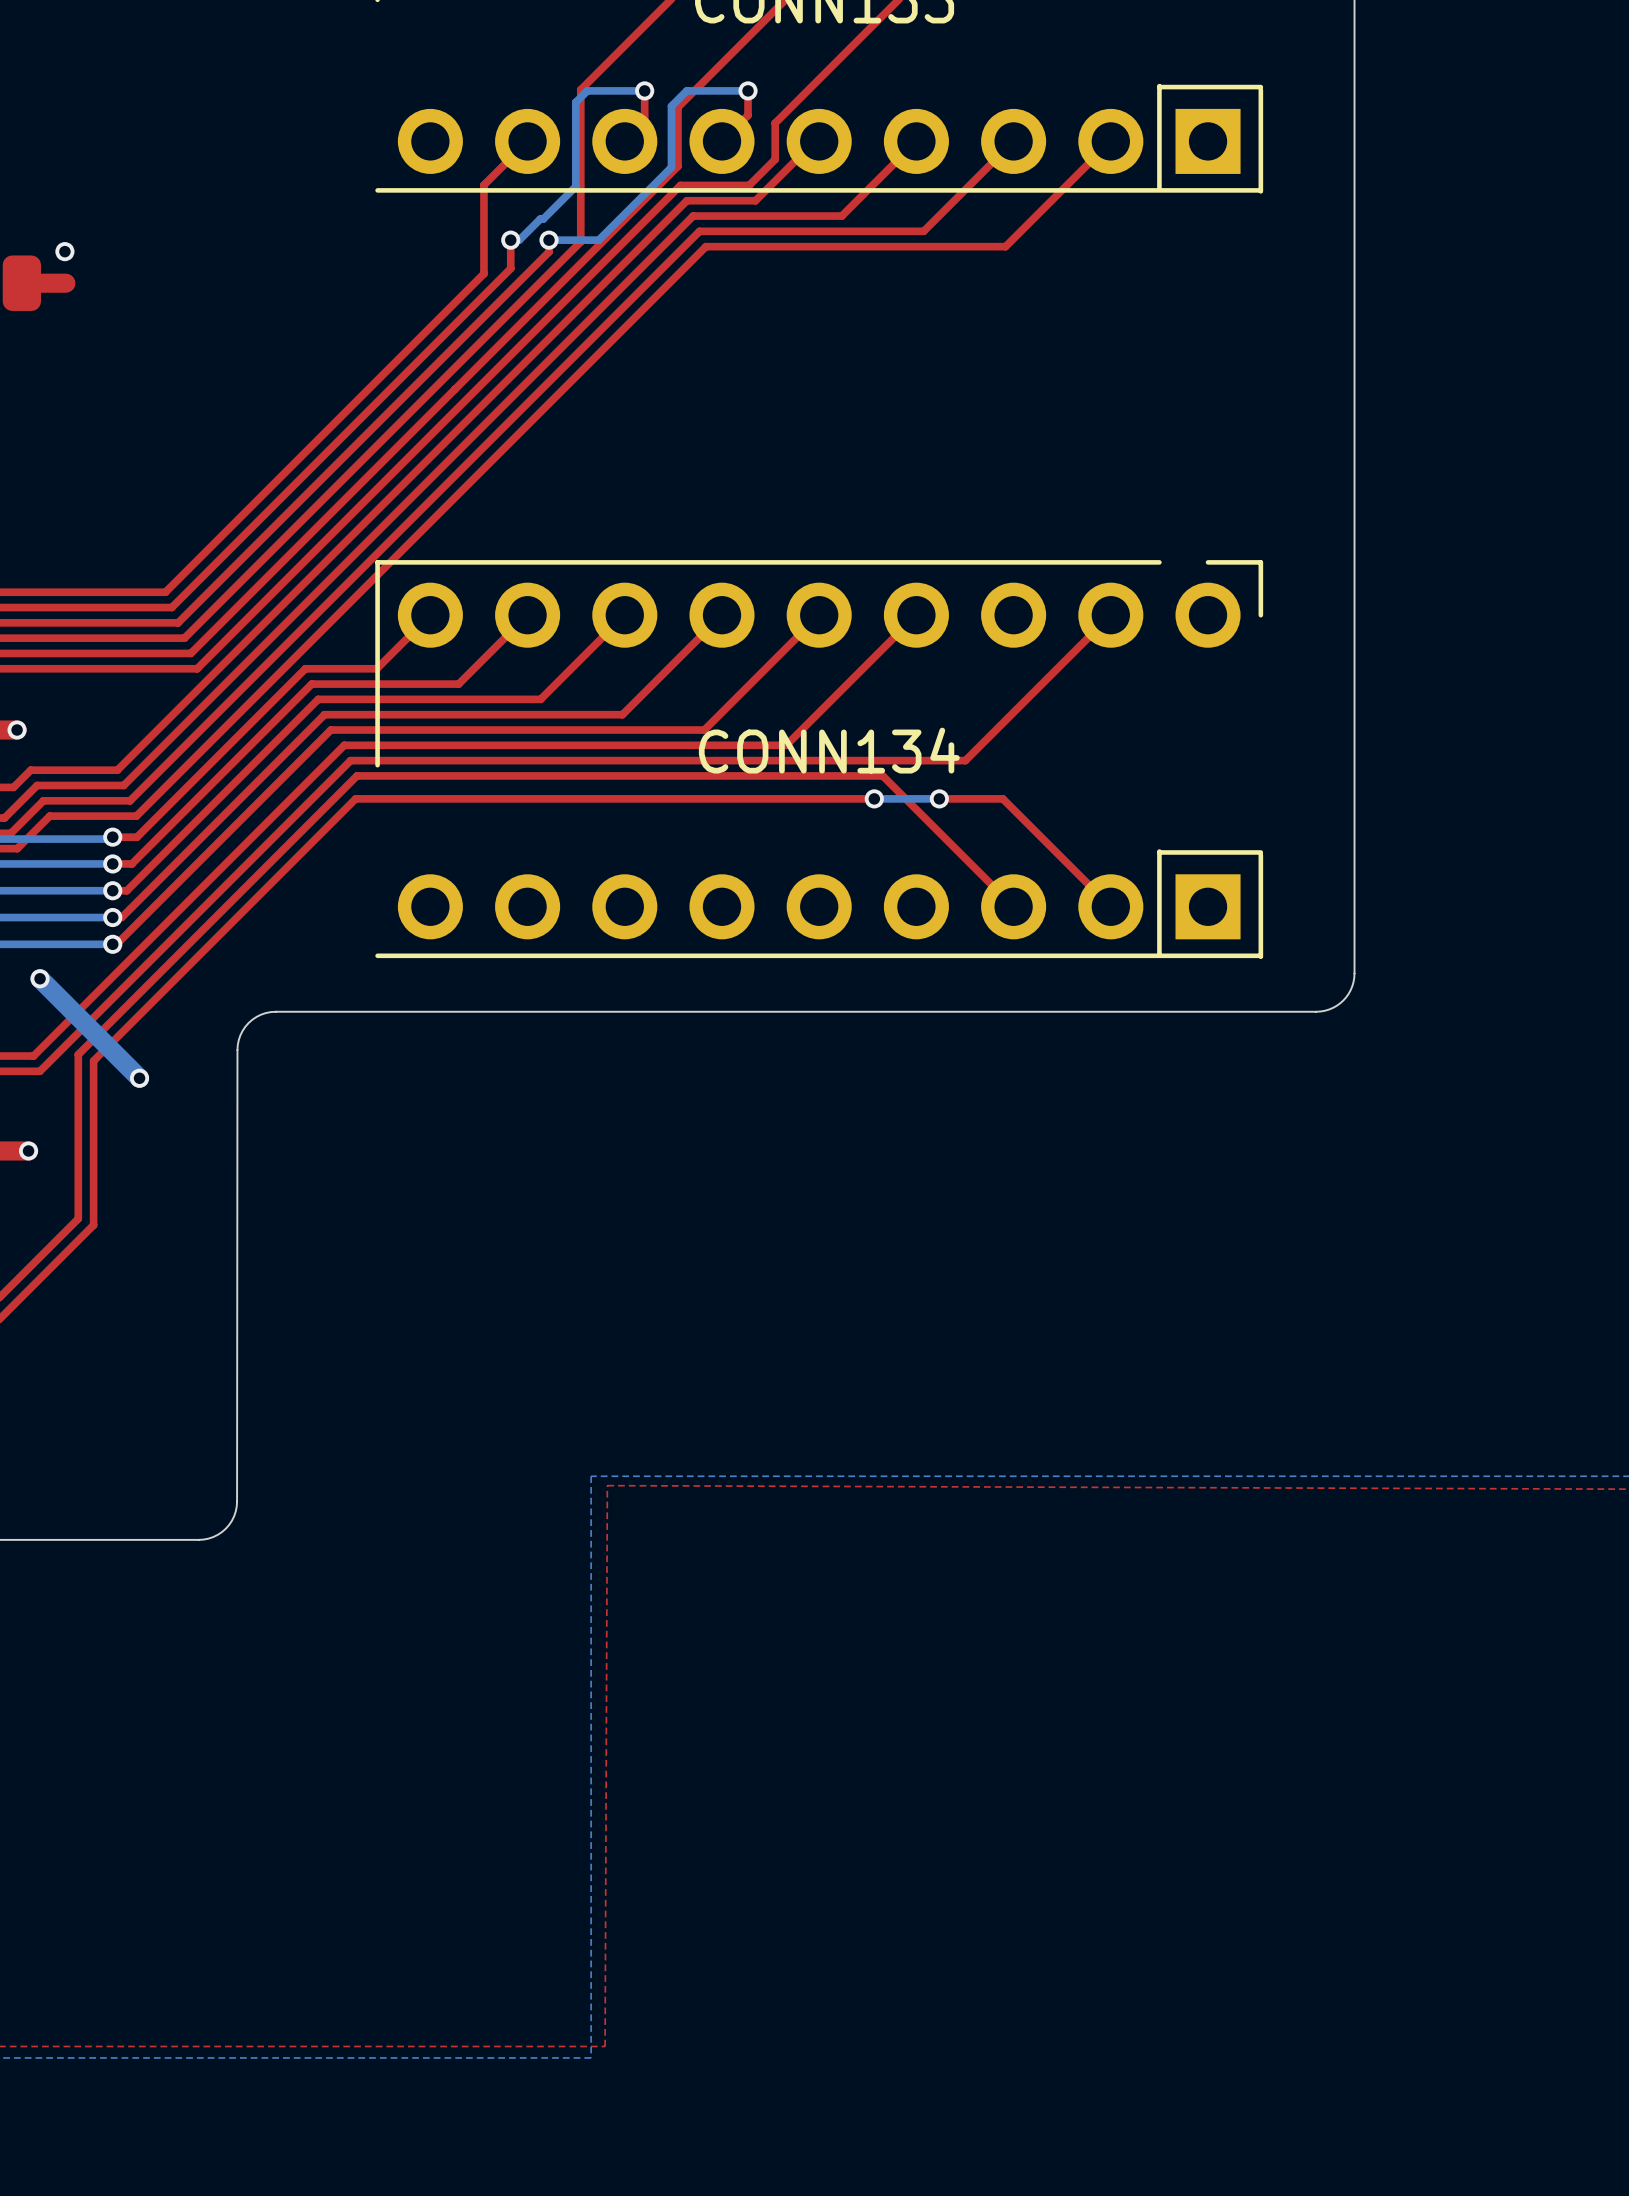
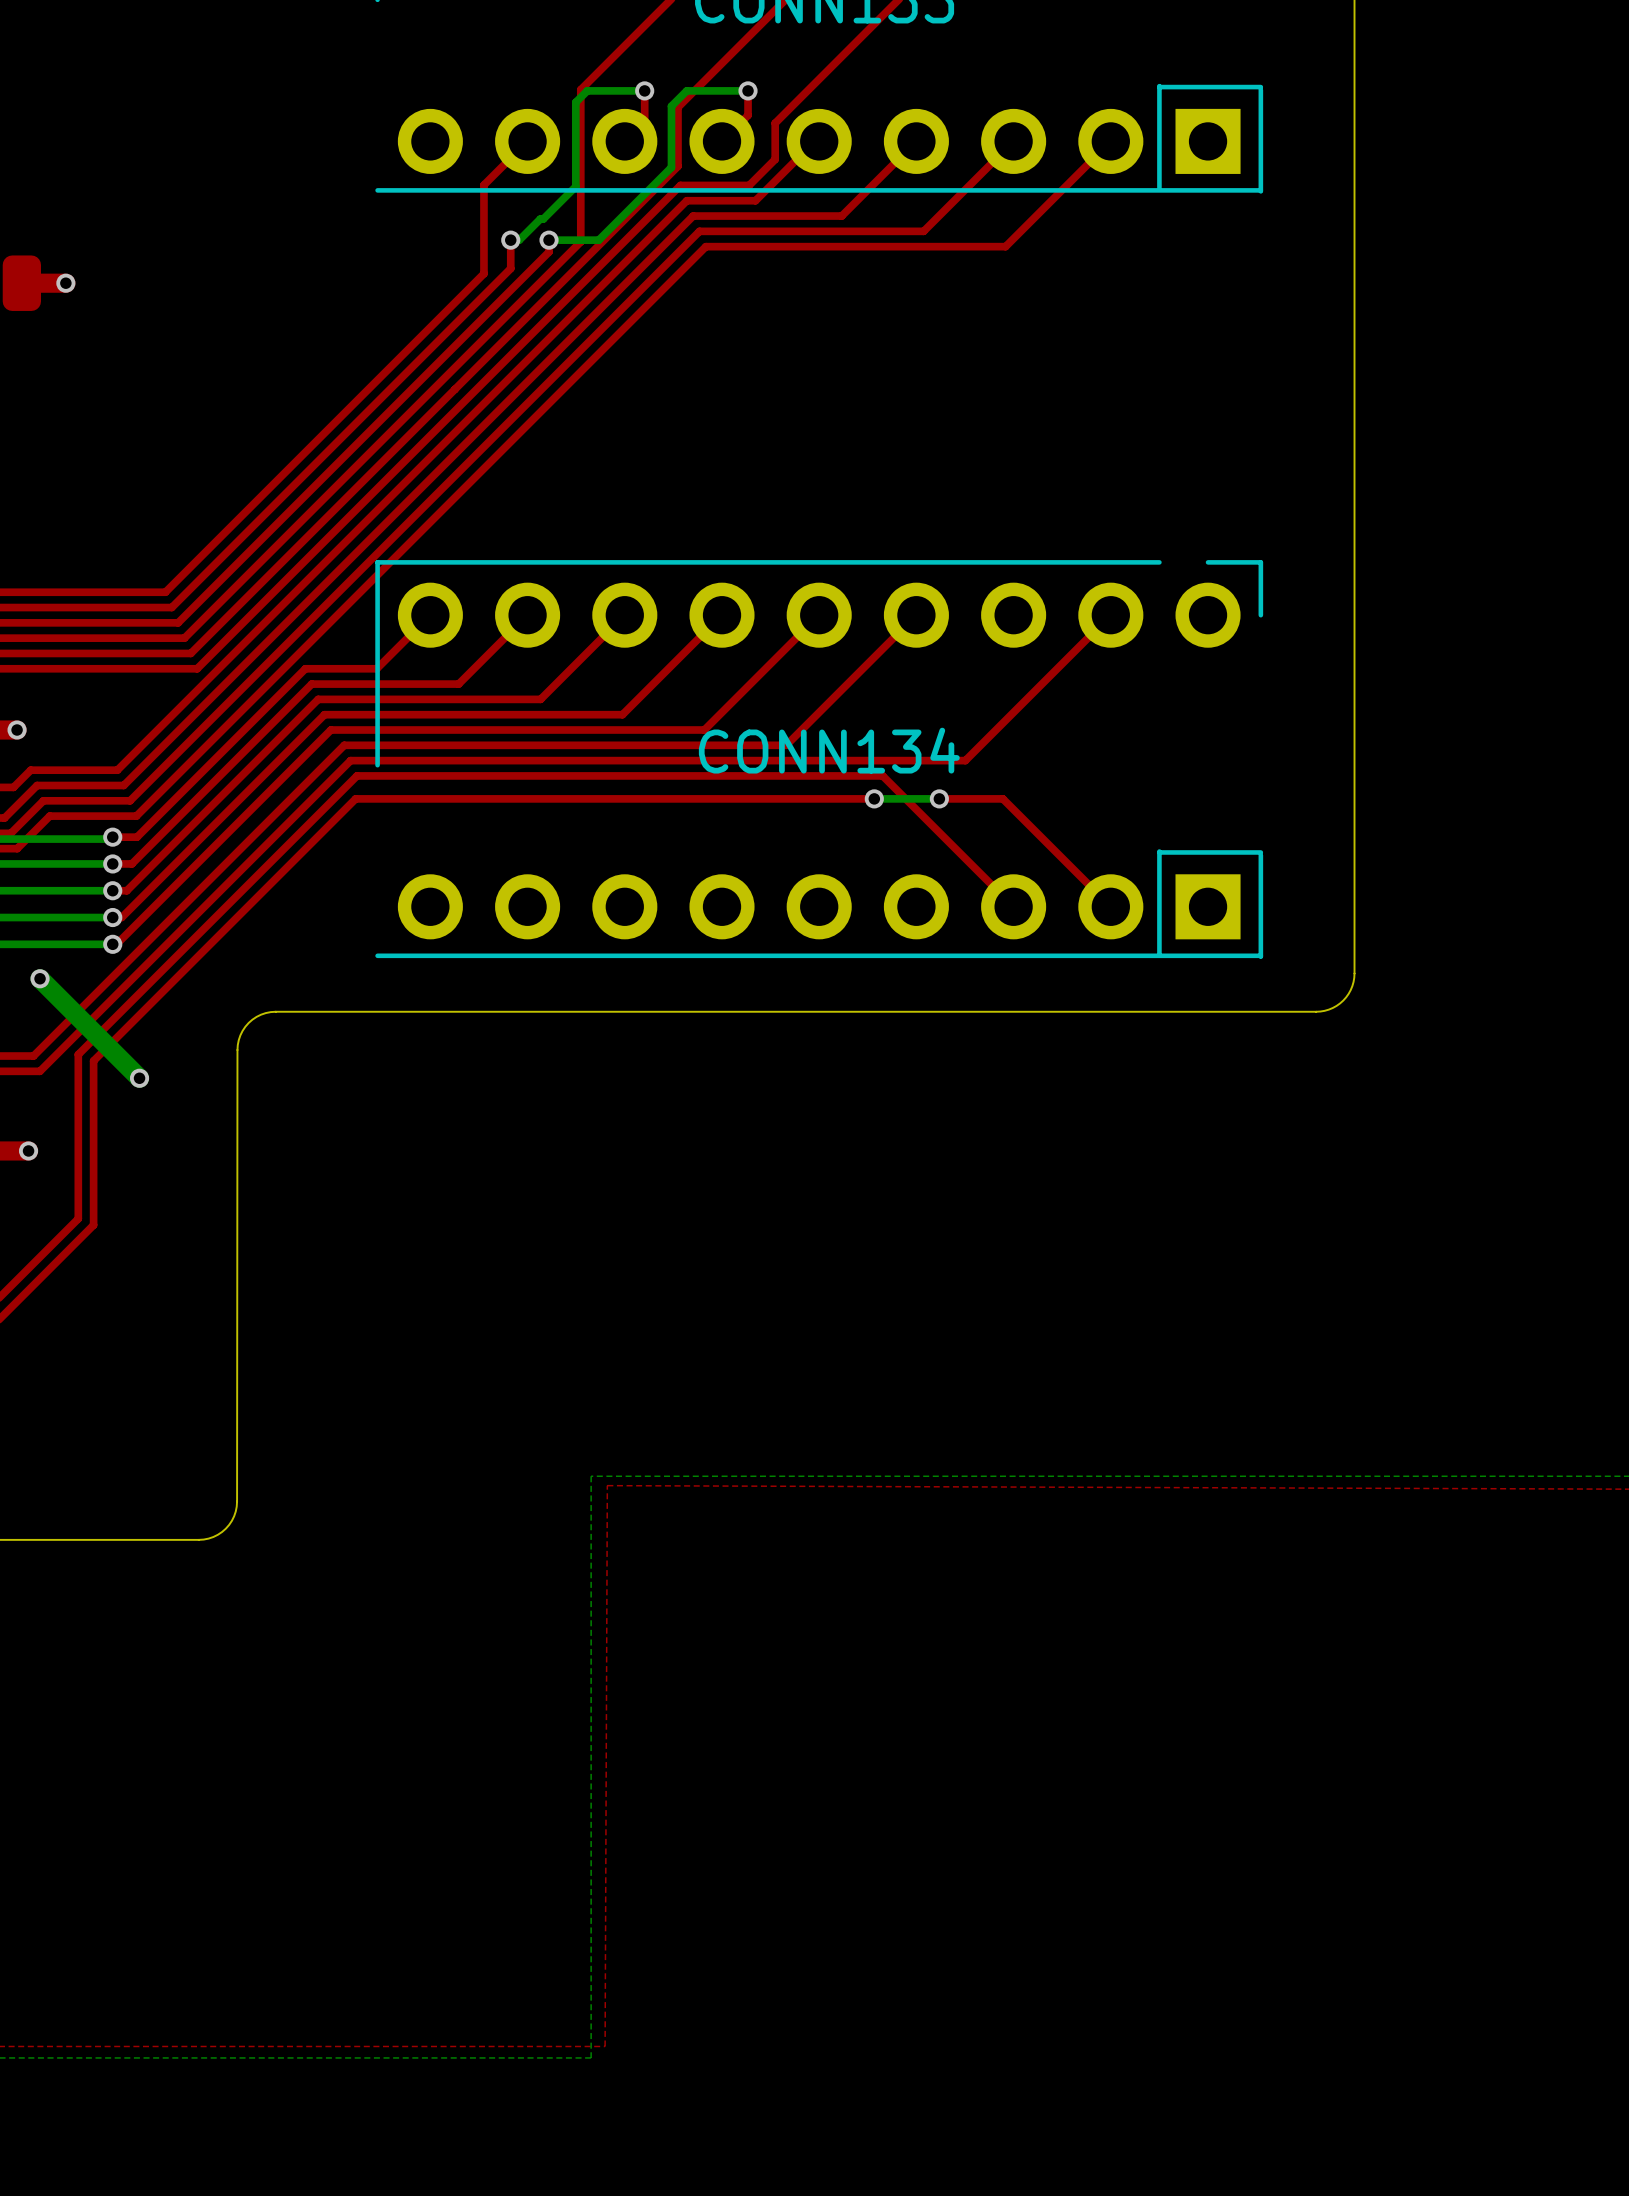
via position: (64, 251) -> (65, 283)

